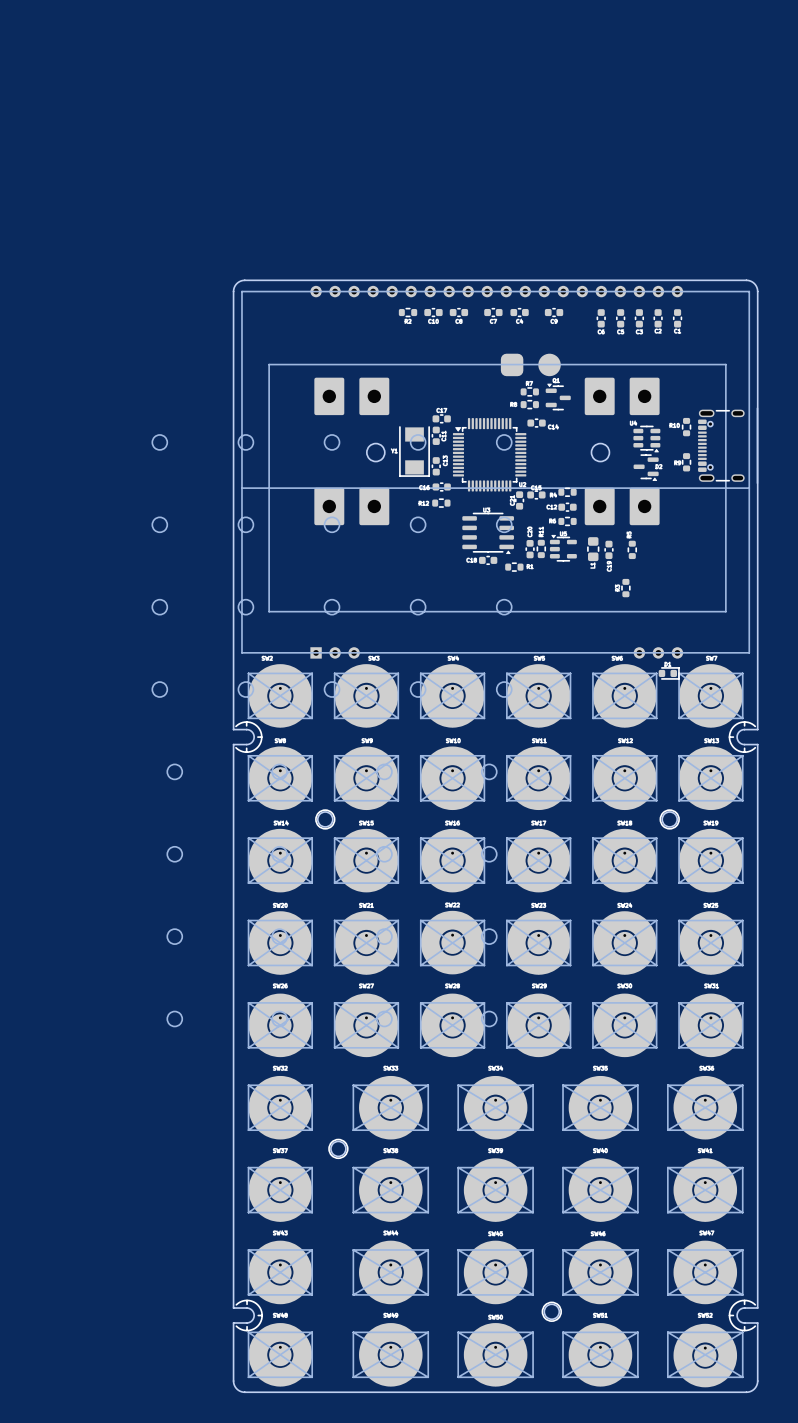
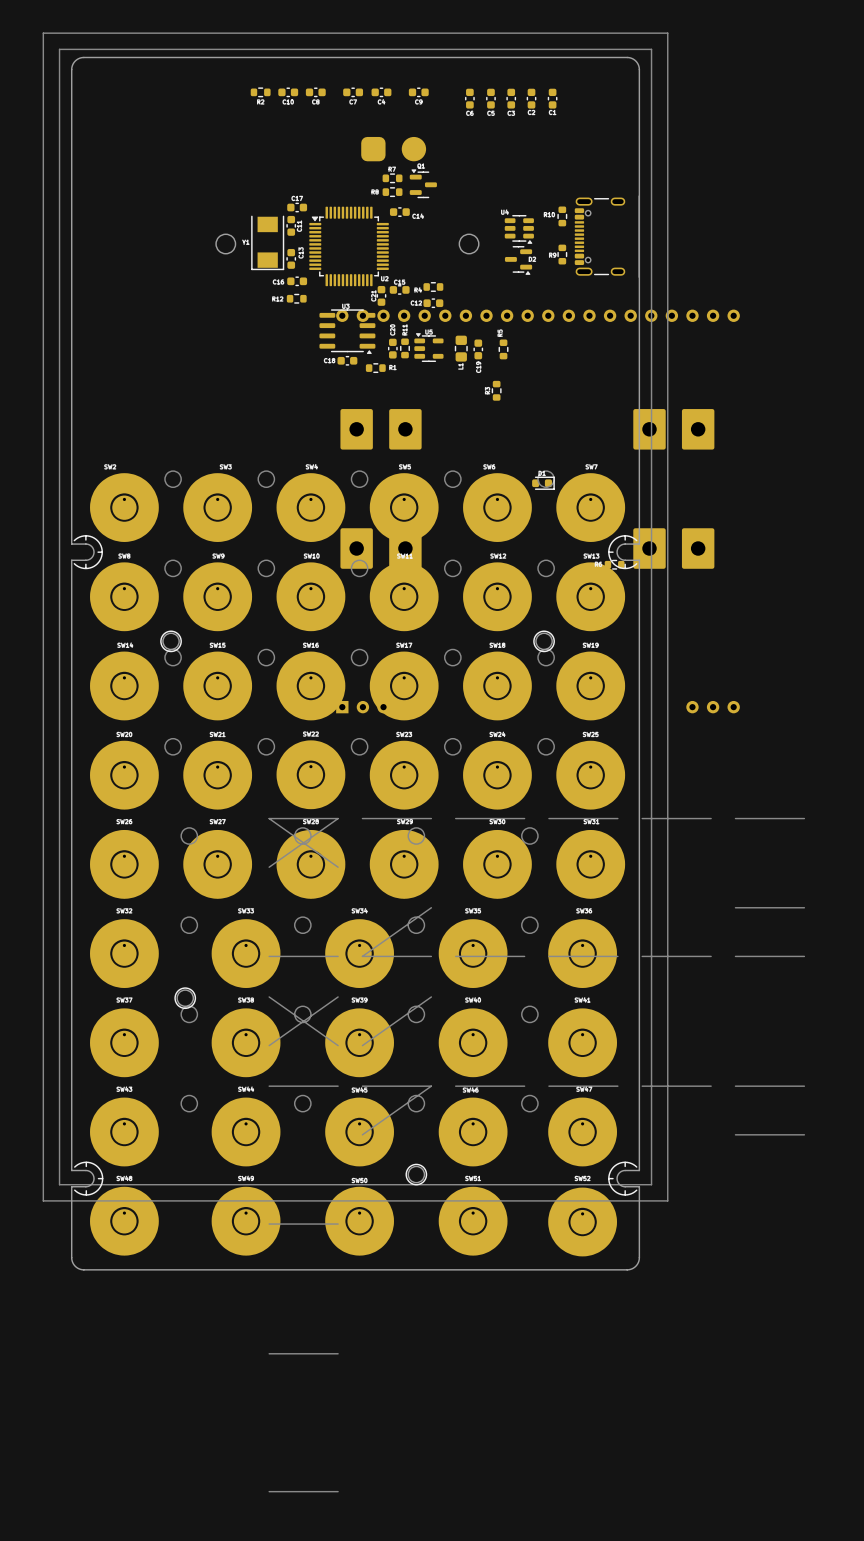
line: none -> (43, 33) (43, 1200) (667, 1200) (667, 33) (43, 33)
line: none -> (59, 49) (59, 1184) (651, 1184) (651, 49) (59, 49)
board edge: none -> (83, 57) (627, 57) (633, 59) (638, 65) (639, 544) (622, 544) (617, 552) (622, 559) (639, 560) (639, 1170) (622, 1171) (617, 1178) (622, 1186) (639, 1186) (639, 1259) (636, 1265) (631, 1268) (83, 1269) (77, 1268) (72, 1262) (71, 1186) (89, 1186) (94, 1178) (89, 1171) (71, 1170) (71, 560) (89, 559) (94, 552) (89, 544) (71, 544) (71, 69) (75, 61) (83, 57)
part: none -> (393, 149)
round board edge: none -> [215, 234, 236, 254]
round board edge: none -> [459, 234, 480, 254]
part: none -> (607, 236)
board edge: (244, 280) (746, 280) (753, 282) (756, 287) (757, 729) (741, 730) (737, 737) (741, 744) (757, 744) (757, 1308) (741, 1308) (737, 1315) (741, 1322) (757, 1322) (757, 1382) (755, 1387) (750, 1391) (244, 1392) (239, 1390) (234, 1385) (233, 1322) (249, 1322) (254, 1315) (249, 1308) (233, 1308) (233, 744) (249, 744) (254, 737) (249, 730) (233, 729) (233, 291) (236, 283) (244, 280) -> none
line: (241, 291) (749, 291) (749, 652) (241, 652) (241, 291) -> none
part position: (408, 312) -> (260, 92)
part position: (433, 312) -> (288, 92)
part position: (458, 312) -> (315, 92)
part position: (493, 312) -> (353, 92)
part position: (519, 312) -> (381, 92)
part position: (554, 312) -> (418, 92)
part position: (601, 318) -> (469, 98)
part position: (620, 318) -> (490, 98)
part position: (639, 318) -> (511, 98)
part position: (658, 318) -> (531, 98)
part position: (677, 318) -> (552, 98)
line: (269, 364) (725, 364) (725, 611) (269, 611) (269, 364) -> none
part: (530, 364) -> none
part position: (529, 391) -> (392, 178)
part position: (558, 396) -> (423, 183)
part position: (529, 404) -> (392, 192)
part position: (441, 418) -> (297, 207)
part position: (536, 423) -> (399, 212)
part position: (686, 427) -> (562, 216)
part position: (436, 435) -> (291, 225)
part position: (646, 439) -> (519, 229)
round board edge: [366, 443, 385, 462] -> none
round board edge: [591, 443, 610, 462] -> none
part: (727, 445) -> none
part position: (414, 451) -> (267, 242)
part position: (489, 454) -> (349, 246)
part position: (686, 462) -> (562, 254)
part position: (436, 466) -> (291, 258)
part position: (646, 467) -> (518, 260)
part position: (441, 486) -> (297, 281)
line: (241, 488) (749, 488) -> none
part position: (567, 492) -> (433, 286)
line: none -> (85, 535) (85, 540)
part position: (536, 494) -> (399, 289)
line: none -> (625, 535) (625, 540)
line: none -> (74, 540) (81, 536) (92, 537) (98, 542) (102, 552) (100, 560) (92, 567) (83, 568) (74, 563)
line: none -> (636, 540) (627, 535) (618, 537) (612, 542) (608, 552) (612, 562) (618, 567) (629, 567) (636, 563)
part position: (519, 500) -> (381, 295)
part position: (441, 503) -> (296, 298)
part position: (567, 507) -> (433, 303)
line: none -> (98, 552) (102, 552)
line: none -> (608, 552) (613, 552)
line: none -> (85, 564) (85, 568)
line: none -> (625, 564) (625, 568)
part position: (488, 533) -> (347, 331)
part position: (541, 548) -> (405, 348)
part position: (563, 548) -> (428, 347)
part position: (530, 549) -> (392, 348)
part position: (593, 549) -> (461, 348)
part position: (608, 549) -> (478, 349)
part position: (632, 549) -> (503, 349)
part position: (488, 560) -> (347, 360)
part position: (514, 567) -> (375, 368)
drawing: none -> [160, 630, 182, 653]
drawing: none -> [533, 630, 555, 653]
round board edge: none -> [162, 632, 180, 650]
round board edge: none -> [535, 632, 553, 650]
part position: (625, 588) -> (496, 390)
line: (248, 673) (248, 718) -> none
line: (248, 673) (312, 673) -> none
line: (248, 673) (312, 718) -> none
line: (312, 673) (312, 718) -> none
line: (312, 673) (248, 718) -> none
line: (334, 673) (398, 673) -> none
line: (334, 673) (398, 718) -> none
line: (334, 673) (334, 718) -> none
line: (398, 673) (398, 718) -> none
line: (398, 673) (334, 718) -> none
line: (420, 673) (484, 673) -> none
line: (420, 673) (420, 718) -> none
line: (420, 673) (484, 718) -> none
line: (484, 673) (484, 718) -> none
line: (484, 673) (420, 718) -> none
line: (506, 673) (570, 673) -> none
line: (506, 673) (506, 718) -> none
line: (506, 673) (570, 718) -> none
line: (570, 673) (570, 718) -> none
line: (570, 673) (506, 718) -> none
line: (592, 673) (656, 673) -> none
line: (592, 673) (592, 718) -> none
line: (592, 673) (656, 718) -> none
line: (656, 673) (656, 718) -> none
line: (656, 673) (592, 718) -> none
part position: (669, 673) -> (543, 483)
line: (679, 673) (679, 718) -> none
line: (679, 673) (742, 673) -> none
line: (679, 673) (742, 718) -> none
line: (742, 673) (742, 718) -> none
line: (742, 673) (679, 718) -> none
part position: (280, 695) -> (124, 507)
part position: (366, 695) -> (217, 507)
part position: (452, 695) -> (310, 507)
part position: (538, 695) -> (404, 507)
part position: (624, 695) -> (497, 507)
part position: (710, 695) -> (590, 507)
line: (248, 718) (312, 718) -> none
line: (334, 718) (398, 718) -> none
line: (420, 718) (484, 718) -> none
line: (506, 718) (570, 718) -> none
line: (592, 718) (656, 718) -> none
line: (679, 718) (742, 718) -> none
line: (246, 722) (246, 725) -> none
line: (744, 722) (744, 725) -> none
line: (235, 726) (244, 722) (252, 723) (259, 729) (261, 737) (259, 744) (252, 751) (244, 752) (235, 747) -> none
line: (755, 726) (746, 722) (738, 723) (732, 727) (729, 737) (731, 744) (738, 751) (748, 751) (755, 747) -> none
line: (257, 737) (261, 737) -> none
line: (729, 737) (733, 737) -> none
line: (246, 748) (246, 752) -> none
line: (744, 748) (744, 752) -> none
line: (248, 755) (248, 800) (312, 800) (312, 755) -> none
part position: (280, 778) -> (124, 596)
part position: (366, 778) -> (217, 596)
part position: (452, 778) -> (310, 596)
part position: (538, 778) -> (404, 596)
part position: (624, 778) -> (497, 596)
part position: (710, 778) -> (590, 596)
line: (334, 800) (398, 800) -> none
line: (334, 800) (334, 755) (398, 800) -> none
line: (334, 800) (398, 755) (398, 800) -> none
line: (420, 800) (484, 755) (484, 800) -> none
line: (420, 800) (484, 800) -> none
line: (420, 800) (420, 755) (484, 800) -> none
line: (506, 800) (506, 755) (570, 800) -> none
line: (506, 800) (570, 800) -> none
line: (506, 800) (570, 755) (570, 800) -> none
line: (592, 800) (592, 755) (656, 800) -> none
line: (592, 800) (656, 800) -> none
line: (592, 800) (656, 755) (656, 800) -> none
line: (679, 800) (679, 755) (742, 800) -> none
line: (679, 800) (742, 800) -> none
line: (679, 800) (742, 755) (742, 800) -> none
drawing: [315, 809, 336, 830] -> none
drawing: [659, 809, 680, 830] -> none
round board edge: [317, 811, 334, 828] -> none
round board edge: [661, 811, 678, 828] -> none
line: (248, 838) (312, 838) -> none
line: (248, 838) (248, 883) (312, 838) -> none
line: (248, 838) (312, 883) (312, 838) -> none
line: (334, 838) (398, 838) (398, 883) (334, 838) -> none
line: (334, 838) (334, 883) -> none
line: (420, 838) (484, 838) -> none
line: (420, 838) (484, 883) (484, 838) -> none
line: (420, 838) (420, 883) (484, 838) -> none
line: (506, 838) (570, 838) -> none
line: (506, 838) (506, 883) (570, 838) -> none
line: (506, 838) (570, 883) (570, 838) -> none
line: (592, 838) (656, 838) -> none
line: (592, 838) (592, 883) (656, 838) -> none
line: (592, 838) (656, 883) (656, 838) -> none
line: (679, 838) (679, 883) (742, 838) (742, 883) (679, 838) -> none
part position: (280, 860) -> (124, 685)
part position: (366, 860) -> (217, 685)
part position: (452, 860) -> (310, 685)
part position: (538, 860) -> (404, 685)
part position: (624, 860) -> (497, 685)
part position: (710, 860) -> (590, 685)
drawing: none -> [174, 987, 196, 1009]
round board edge: none -> [176, 989, 194, 1007]
line: (248, 920) (312, 920) (312, 965) (248, 965) (248, 920) -> none
line: (334, 920) (398, 920) (398, 965) -> none
line: (334, 920) (334, 965) (398, 965) -> none
line: (334, 920) (398, 965) -> none
line: (420, 920) (484, 920) -> none
line: (420, 920) (420, 965) -> none
line: (420, 920) (484, 965) -> none
line: (484, 920) (484, 965) -> none
line: (484, 920) (420, 965) -> none
line: (506, 920) (570, 920) -> none
line: (506, 920) (506, 965) -> none
line: (506, 920) (570, 965) -> none
line: (570, 920) (570, 965) -> none
line: (570, 920) (506, 965) -> none
line: (592, 920) (656, 920) -> none
line: (592, 920) (592, 965) -> none
line: (592, 920) (656, 965) -> none
line: (656, 920) (656, 965) -> none
line: (656, 920) (592, 965) -> none
line: (679, 920) (742, 920) -> none
line: (679, 920) (679, 965) -> none
line: (679, 920) (742, 965) -> none
line: (742, 920) (742, 965) -> none
line: (742, 920) (679, 965) -> none
part position: (280, 942) -> (124, 775)
part position: (366, 942) -> (217, 775)
part position: (452, 942) -> (310, 774)
part position: (538, 942) -> (404, 775)
part position: (624, 942) -> (497, 775)
part position: (710, 942) -> (590, 775)
line: (420, 965) (484, 965) -> none
line: (506, 965) (570, 965) -> none
line: (592, 965) (656, 965) -> none
line: (679, 965) (742, 965) -> none
line: (398, 1002) (398, 1047) -> none
line: (679, 1002) (679, 1047) (742, 1002) (742, 1047) (679, 1002) -> none
part position: (280, 1025) -> (124, 864)
part position: (366, 1025) -> (217, 864)
part position: (452, 1025) -> (310, 864)
part position: (538, 1025) -> (404, 864)
part position: (624, 1025) -> (497, 864)
part position: (710, 1025) -> (590, 864)
line: (248, 1047) (312, 1047) -> none
line: (248, 1047) (248, 1002) (312, 1047) -> none
line: (248, 1047) (312, 1002) (312, 1047) -> none
line: (398, 1047) (334, 1047) (334, 1002) (398, 1047) -> none
line: (420, 1047) (484, 1047) -> none
line: (420, 1047) (420, 1002) (484, 1047) -> none
line: (420, 1047) (484, 1002) (484, 1047) -> none
line: (506, 1047) (570, 1047) -> none
line: (506, 1047) (506, 1002) (570, 1047) -> none
line: (506, 1047) (570, 1002) (570, 1047) -> none
line: (592, 1047) (656, 1047) -> none
line: (592, 1047) (592, 1002) (656, 1047) -> none
line: (592, 1047) (656, 1002) (656, 1047) -> none
line: none -> (86, 1162) (86, 1166)
line: none -> (625, 1162) (625, 1166)
line: none -> (74, 1167) (82, 1162) (92, 1163) (99, 1168) (102, 1178) (99, 1188) (92, 1193) (84, 1194) (74, 1190)
line: none -> (636, 1167) (627, 1162) (618, 1163) (611, 1170) (608, 1178) (612, 1188) (618, 1193) (627, 1194) (636, 1190)
line: (248, 1085) (248, 1130) (312, 1085) -> none
line: (248, 1085) (312, 1085) -> none
line: (248, 1085) (312, 1130) (312, 1085) -> none
line: (353, 1085) (428, 1085) -> none
line: (353, 1085) (353, 1130) -> none
line: (353, 1085) (428, 1130) -> none
line: (428, 1085) (428, 1130) -> none
line: (428, 1085) (353, 1130) -> none
line: (458, 1085) (533, 1085) -> none
line: (458, 1085) (458, 1130) -> none
line: (458, 1085) (533, 1130) -> none
line: (533, 1085) (458, 1130) -> none
line: (533, 1085) (533, 1130) -> none
line: (563, 1085) (637, 1085) -> none
line: (563, 1085) (563, 1130) -> none
line: (563, 1085) (637, 1130) -> none
line: (637, 1085) (637, 1130) -> none
line: (637, 1085) (563, 1130) -> none
line: (667, 1085) (742, 1085) -> none
line: (667, 1085) (742, 1130) -> none
line: (667, 1085) (667, 1130) -> none
line: (742, 1085) (742, 1130) -> none
line: (742, 1085) (667, 1130) -> none
line: none -> (98, 1178) (102, 1178)
line: none -> (608, 1178) (613, 1178)
line: none -> (86, 1190) (86, 1194)
line: none -> (625, 1190) (625, 1194)
part position: (280, 1107) -> (124, 953)
part position: (390, 1107) -> (246, 953)
part position: (495, 1107) -> (359, 953)
part position: (600, 1107) -> (473, 953)
part position: (705, 1107) -> (582, 953)
line: (353, 1130) (428, 1130) -> none
line: (458, 1130) (533, 1130) -> none
line: (563, 1130) (637, 1130) -> none
line: (667, 1130) (742, 1130) -> none
drawing position: (338, 1148) -> (416, 1174)
round board edge position: (338, 1148) -> (416, 1174)
line: (248, 1167) (248, 1212) -> none
line: (248, 1167) (312, 1167) -> none
line: (248, 1167) (312, 1212) -> none
line: (312, 1167) (312, 1212) -> none
line: (312, 1167) (248, 1212) -> none
line: (353, 1167) (428, 1167) -> none
line: (353, 1167) (428, 1212) -> none
line: (353, 1167) (353, 1212) -> none
line: (428, 1167) (428, 1212) -> none
line: (428, 1167) (353, 1212) -> none
line: (458, 1167) (533, 1167) -> none
line: (458, 1167) (458, 1212) -> none
line: (458, 1167) (533, 1212) -> none
line: (533, 1167) (458, 1212) -> none
line: (533, 1167) (533, 1212) -> none
line: (563, 1167) (563, 1212) -> none
line: (563, 1167) (637, 1167) -> none
line: (563, 1167) (637, 1212) -> none
line: (637, 1167) (637, 1212) -> none
line: (637, 1167) (563, 1212) -> none
line: (667, 1167) (742, 1167) -> none
line: (667, 1167) (742, 1212) -> none
line: (667, 1167) (667, 1212) -> none
line: (742, 1167) (742, 1212) -> none
line: (742, 1167) (667, 1212) -> none
part position: (280, 1190) -> (124, 1042)
part position: (390, 1190) -> (246, 1042)
part position: (495, 1190) -> (359, 1042)
part position: (600, 1190) -> (473, 1042)
part position: (705, 1190) -> (582, 1042)
line: (248, 1212) (312, 1212) -> none
line: (353, 1212) (428, 1212) -> none
line: (458, 1212) (533, 1212) -> none
line: (563, 1212) (637, 1212) -> none
line: (667, 1212) (742, 1212) -> none
line: (353, 1249) (428, 1249) -> none
line: (353, 1249) (428, 1294) -> none
line: (353, 1249) (353, 1294) -> none
line: (428, 1249) (428, 1294) -> none
line: (428, 1249) (353, 1294) -> none
line: (458, 1249) (458, 1294) -> none
line: (458, 1249) (533, 1249) -> none
line: (458, 1249) (533, 1294) -> none
line: (533, 1249) (533, 1294) -> none
line: (533, 1249) (458, 1294) -> none
line: (563, 1249) (563, 1294) -> none
line: (563, 1249) (637, 1249) -> none
line: (563, 1249) (637, 1294) -> none
line: (637, 1249) (637, 1294) -> none
line: (637, 1249) (563, 1294) -> none
line: (667, 1249) (742, 1249) -> none
line: (667, 1249) (667, 1294) -> none
line: (667, 1249) (742, 1294) -> none
line: (742, 1249) (742, 1294) -> none
line: (742, 1249) (667, 1294) -> none
part position: (280, 1272) -> (124, 1131)
part position: (390, 1272) -> (246, 1131)
part position: (495, 1272) -> (359, 1131)
part position: (600, 1272) -> (473, 1131)
part position: (705, 1272) -> (582, 1131)
line: (248, 1294) (248, 1249) (312, 1294) -> none
line: (248, 1294) (312, 1294) -> none
line: (248, 1294) (312, 1249) (312, 1294) -> none
line: (353, 1294) (428, 1294) -> none
line: (458, 1294) (533, 1294) -> none
line: (563, 1294) (637, 1294) -> none
line: (667, 1294) (742, 1294) -> none
line: (247, 1300) (247, 1304) -> none
line: (744, 1300) (744, 1304) -> none
drawing: [541, 1301, 562, 1322] -> none
round board edge: [543, 1303, 560, 1320] -> none
line: (236, 1304) (245, 1300) (252, 1301) (259, 1306) (262, 1315) (259, 1324) (252, 1329) (243, 1330) (236, 1326) -> none
line: (755, 1304) (746, 1300) (738, 1301) (731, 1307) (729, 1315) (731, 1323) (738, 1329) (746, 1330) (755, 1326) -> none
line: (258, 1315) (262, 1315) -> none
line: (729, 1315) (733, 1315) -> none
line: (247, 1326) (247, 1330) -> none
line: (744, 1326) (744, 1330) -> none
line: (248, 1332) (248, 1377) (312, 1332) -> none
line: (248, 1332) (312, 1332) -> none
line: (248, 1332) (312, 1377) (312, 1332) -> none
line: (353, 1332) (428, 1332) -> none
line: (353, 1332) (353, 1377) -> none
line: (353, 1332) (428, 1377) -> none
line: (428, 1332) (428, 1377) -> none
line: (428, 1332) (353, 1377) -> none
line: (458, 1332) (533, 1332) -> none
line: (458, 1332) (458, 1377) -> none
line: (458, 1332) (533, 1377) -> none
line: (533, 1332) (458, 1377) -> none
line: (533, 1332) (533, 1377) -> none
line: (563, 1332) (637, 1332) -> none
line: (563, 1332) (563, 1377) -> none
line: (563, 1332) (637, 1377) -> none
line: (637, 1332) (637, 1377) -> none
line: (637, 1332) (563, 1377) -> none
line: (667, 1332) (742, 1332) -> none
line: (667, 1332) (667, 1377) -> none
line: (667, 1332) (742, 1377) -> none
line: (742, 1332) (742, 1377) -> none
line: (742, 1332) (667, 1377) -> none
part position: (280, 1354) -> (124, 1221)
part position: (390, 1354) -> (246, 1221)
part position: (495, 1354) -> (359, 1221)
part position: (600, 1354) -> (473, 1221)
part position: (705, 1355) -> (582, 1222)
line: (353, 1377) (428, 1377) -> none
line: (458, 1377) (533, 1377) -> none
line: (563, 1377) (637, 1377) -> none
line: (667, 1377) (742, 1377) -> none

